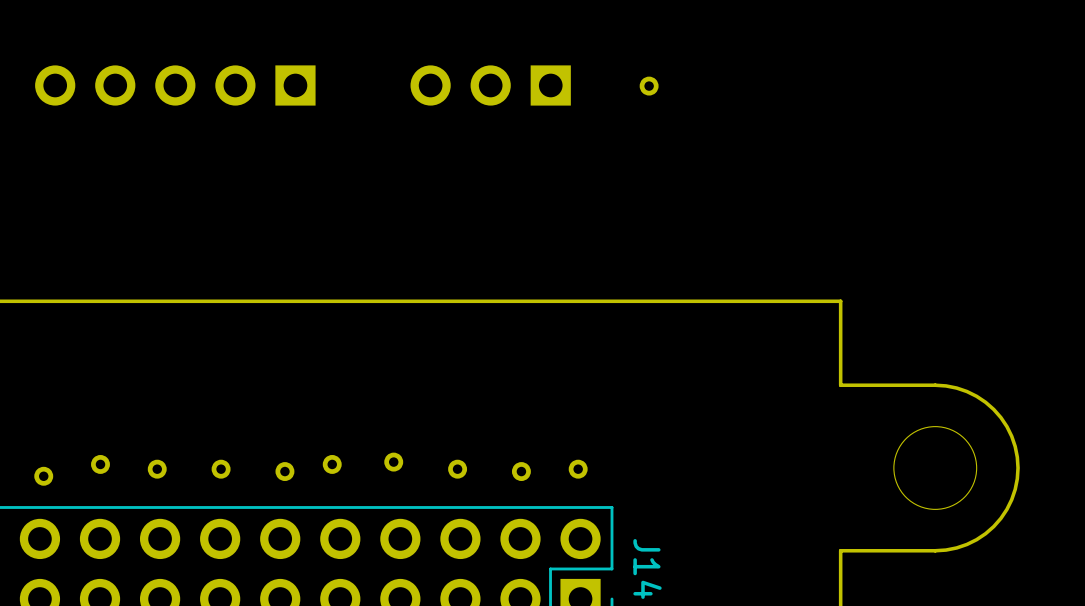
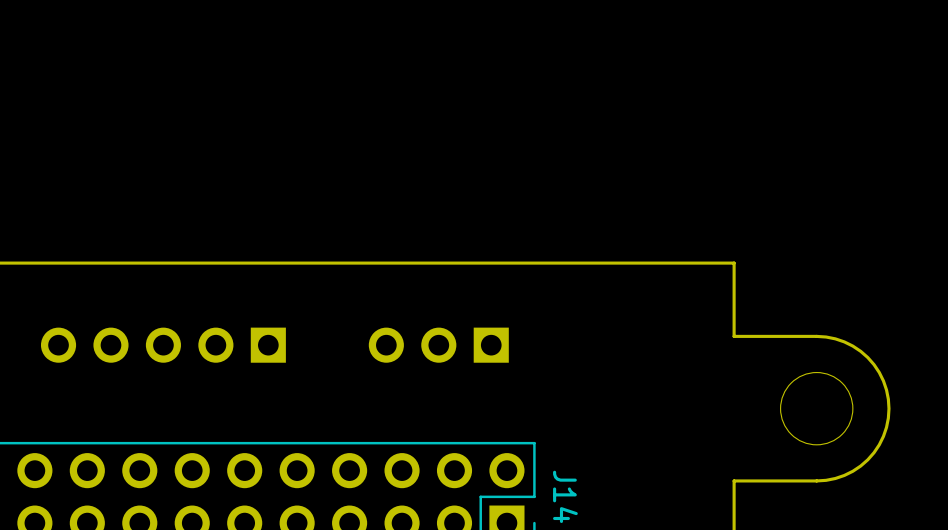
part position: (175, 85) -> (163, 345)
part position: (490, 85) -> (438, 345)
part: (649, 86) -> none
part: (393, 462) -> none
part: (100, 464) -> none
part: (332, 464) -> none
part: (157, 469) -> none
part: (221, 469) -> none
part: (457, 469) -> none
part: (578, 469) -> none
part: (284, 471) -> none
part: (521, 471) -> none
part: (43, 476) -> none

